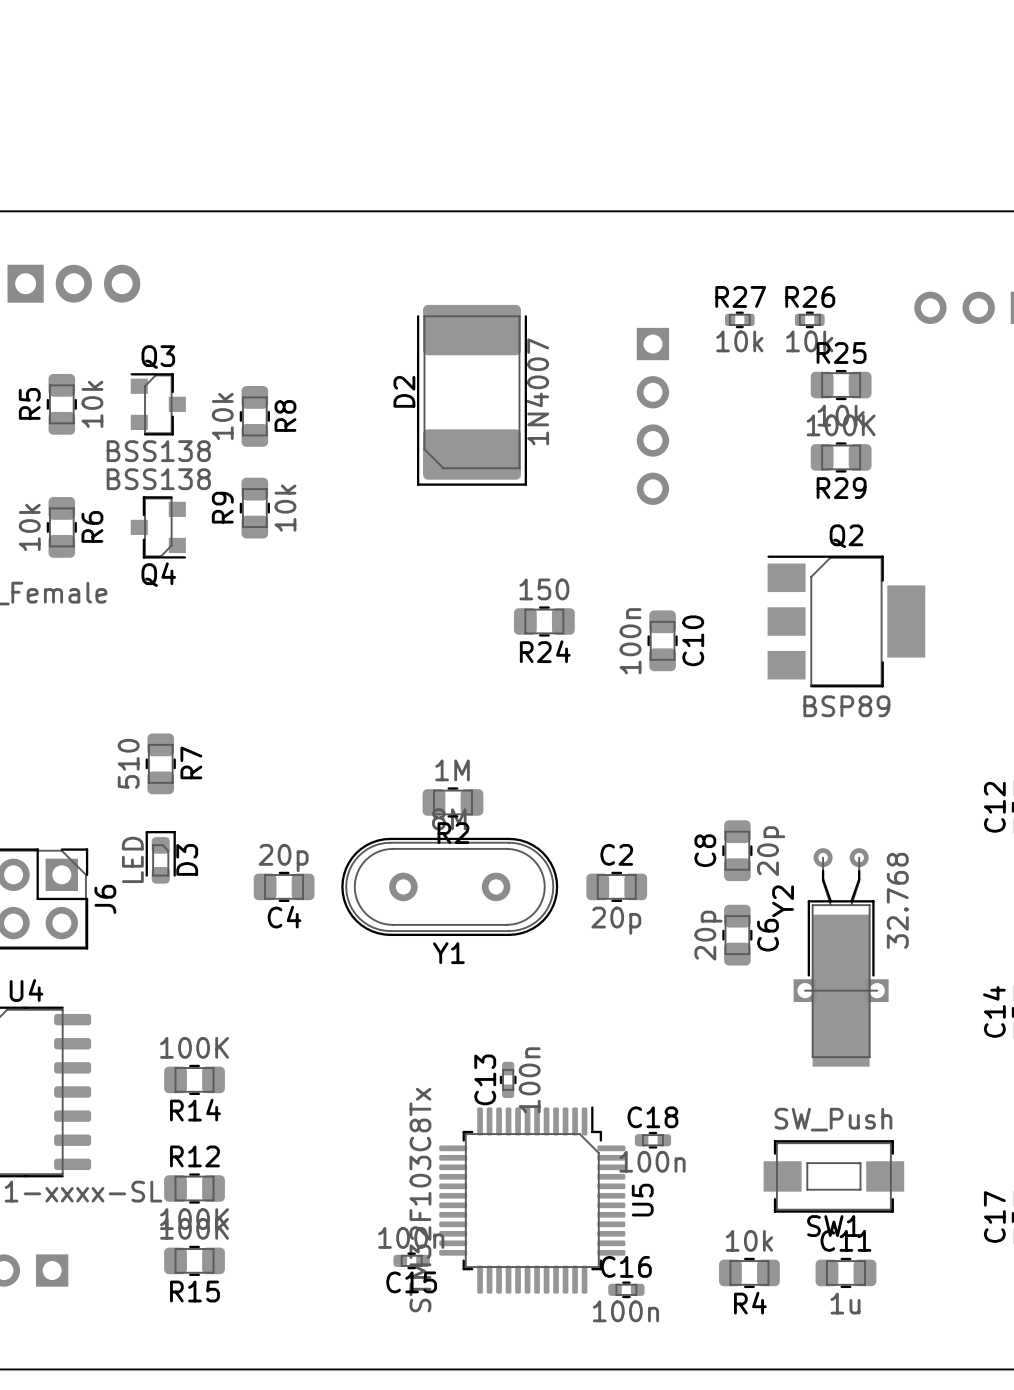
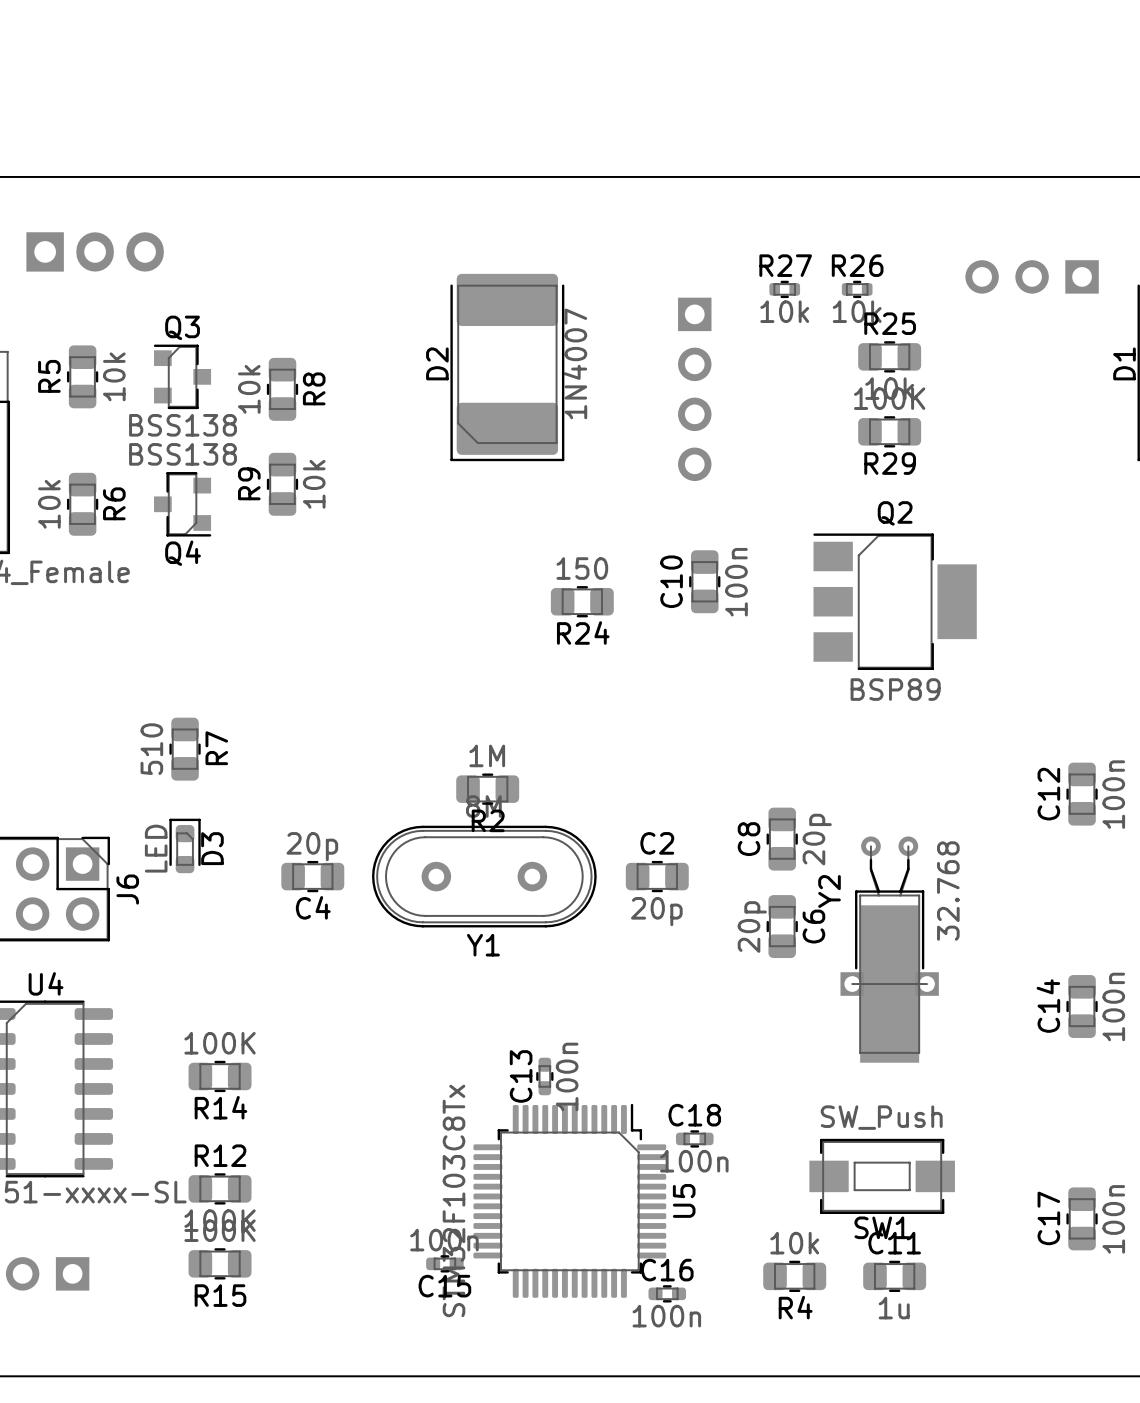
C10 position: (662, 640) -> (704, 581)
C10 name position: C10 (693, 640) -> C10 (671, 581)
C10 value position: 100n (630, 641) -> 100n (736, 582)

